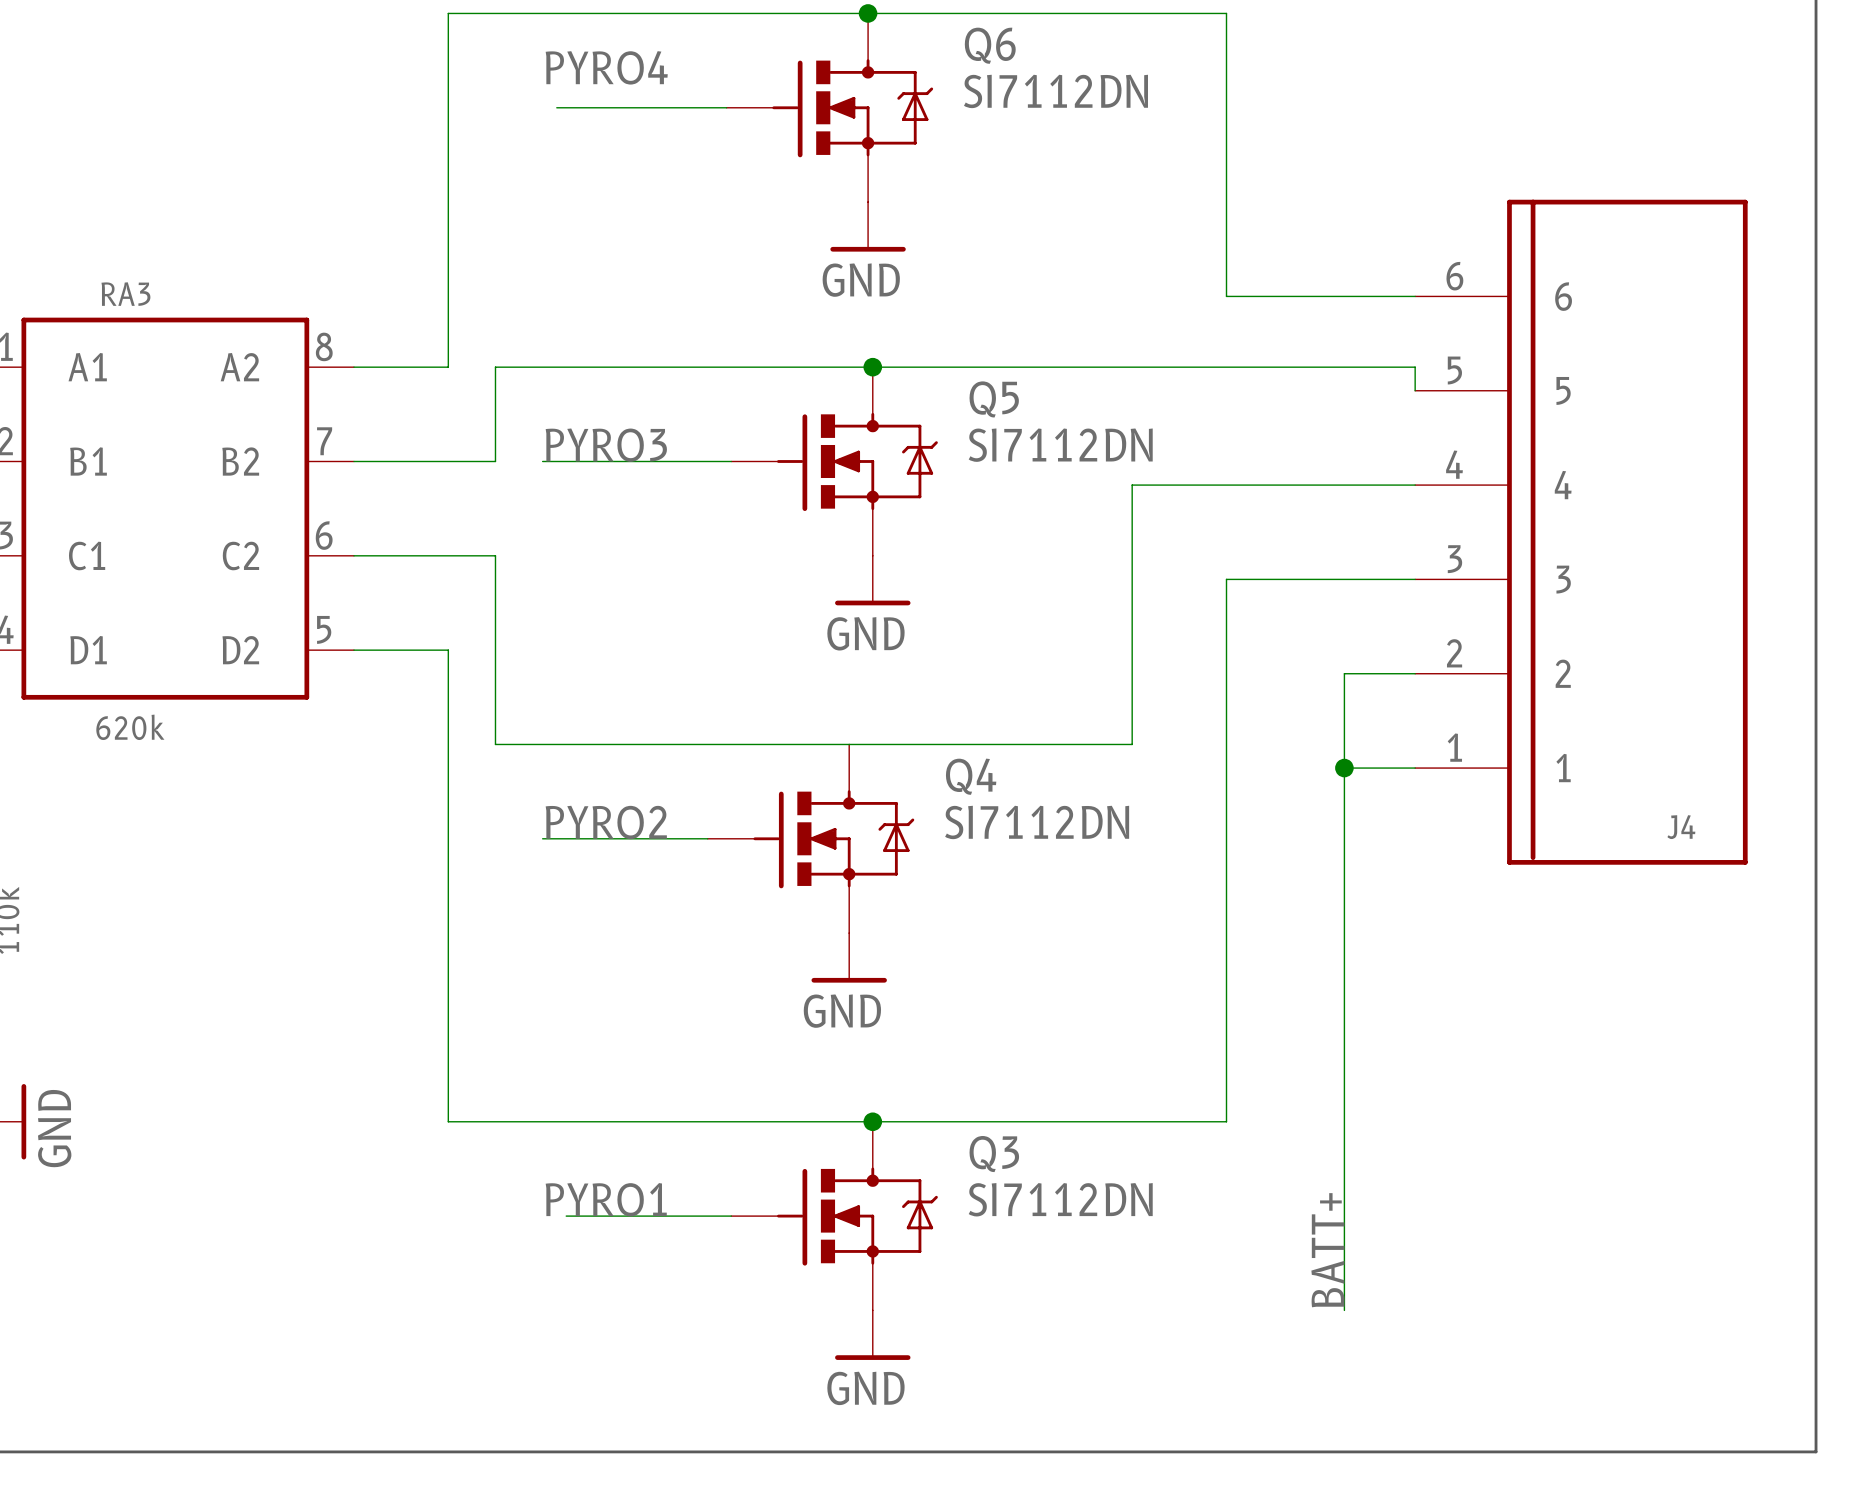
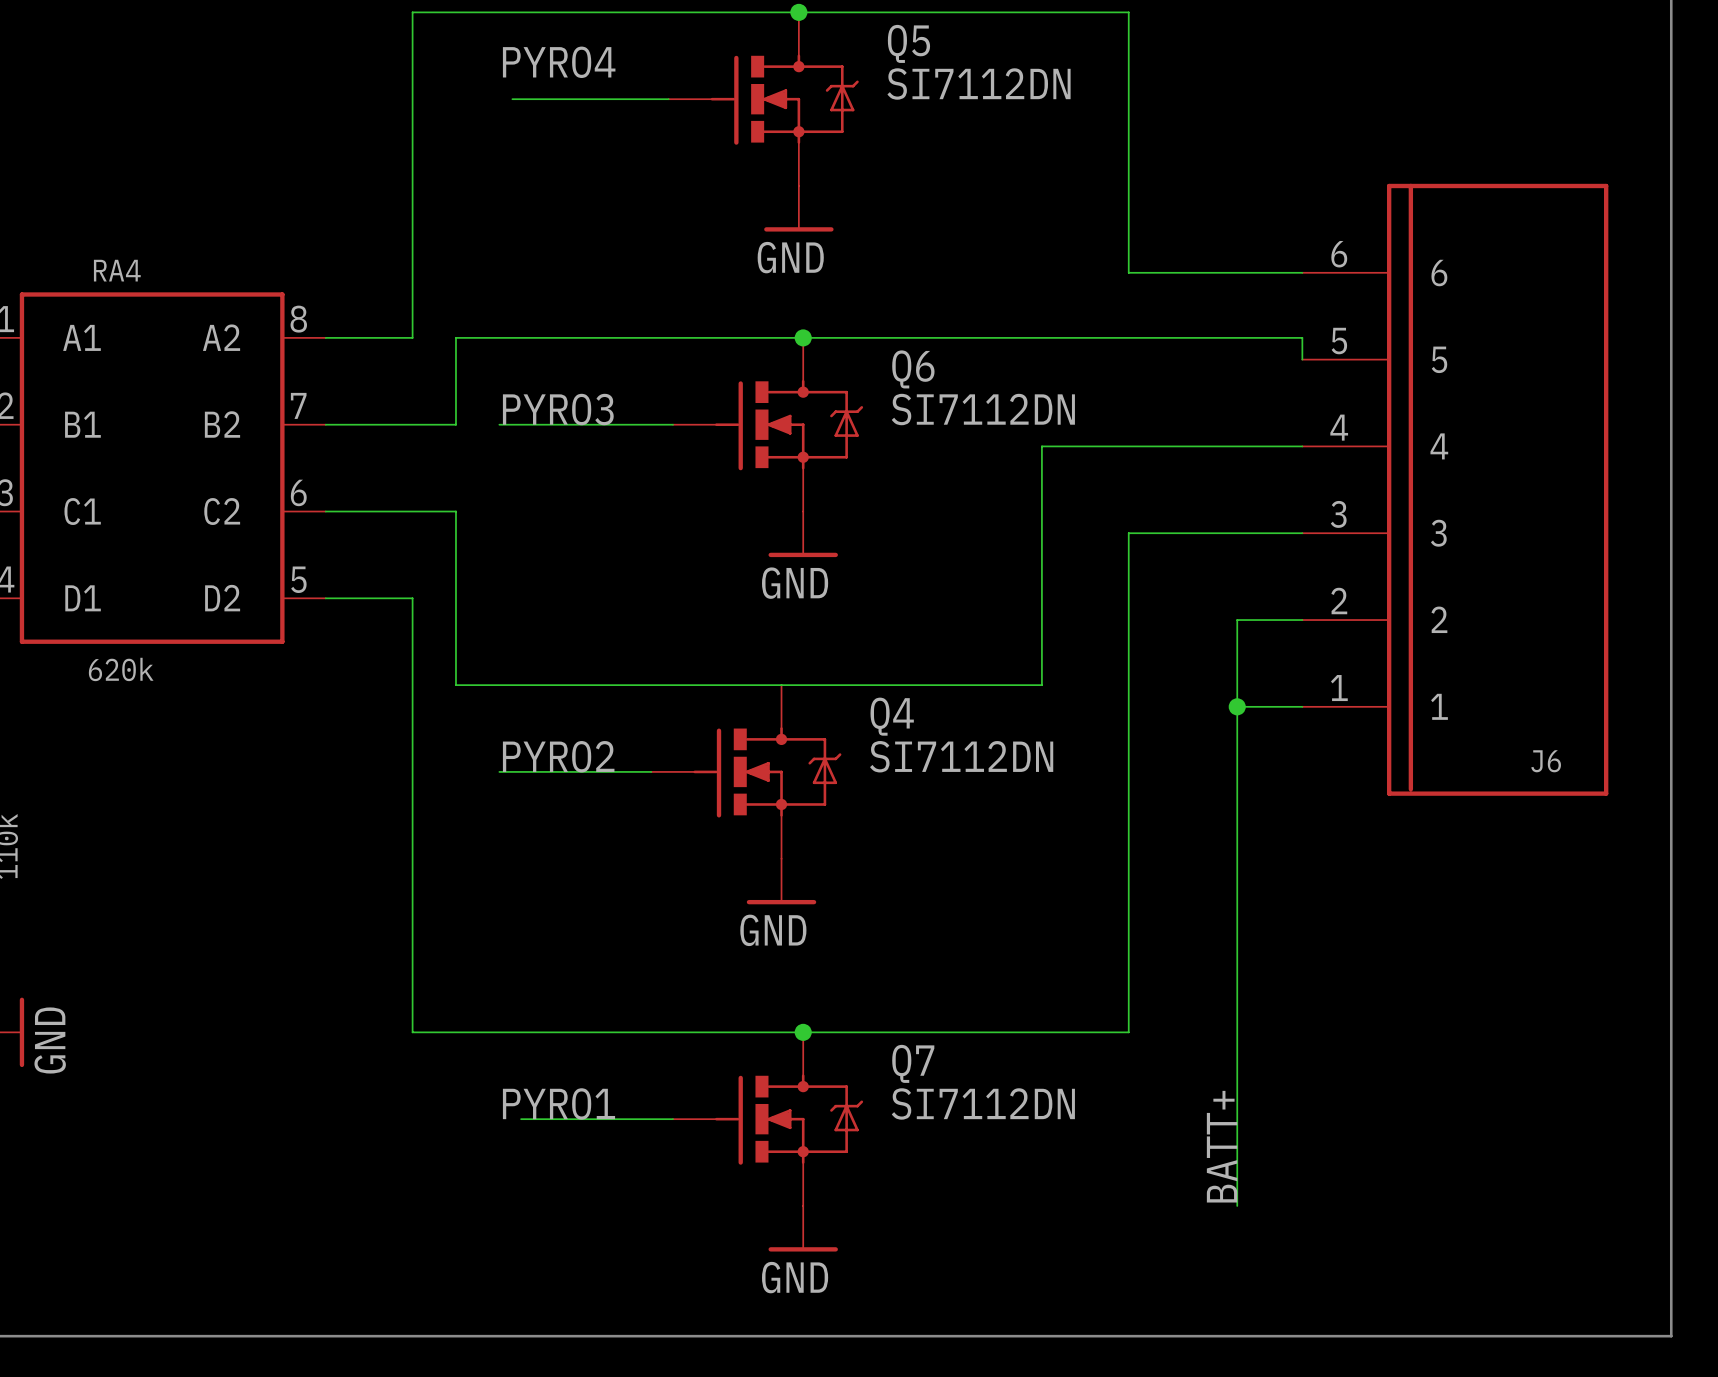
Q6 name: Q6 (990, 45) -> Q5 (908, 43)
RA3 name: RA3 (125, 294) -> RA4 (117, 270)
Q5 name: Q5 (994, 399) -> Q6 (913, 369)
J4 name: J4 (1681, 827) -> J6 (1546, 761)
Q3 name: Q3 (994, 1154) -> Q7 (913, 1063)

